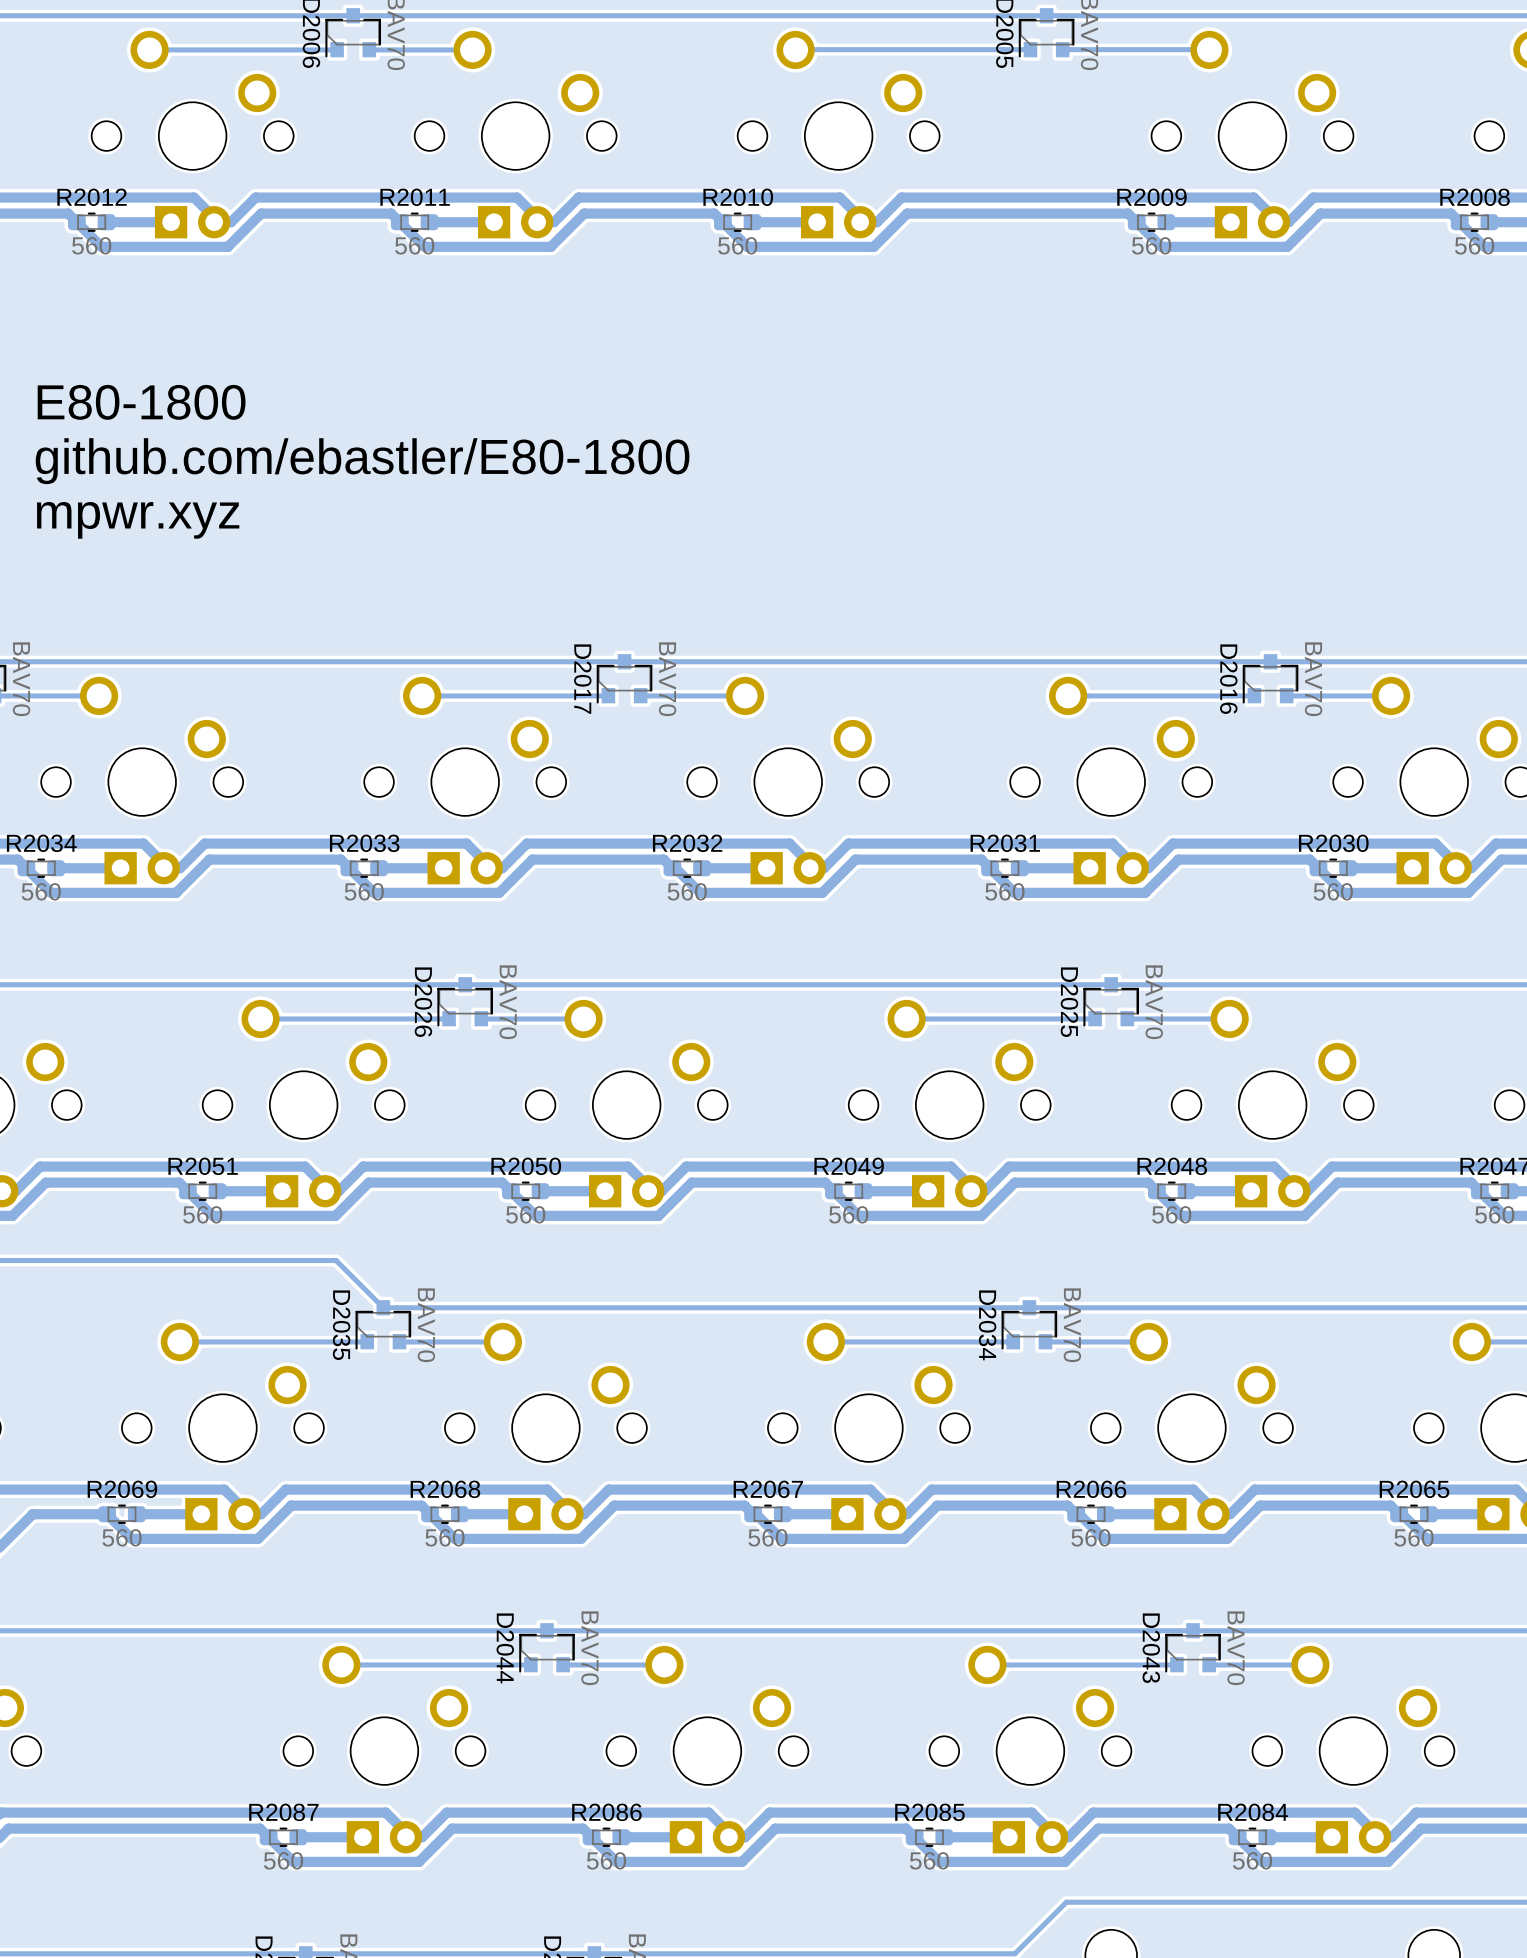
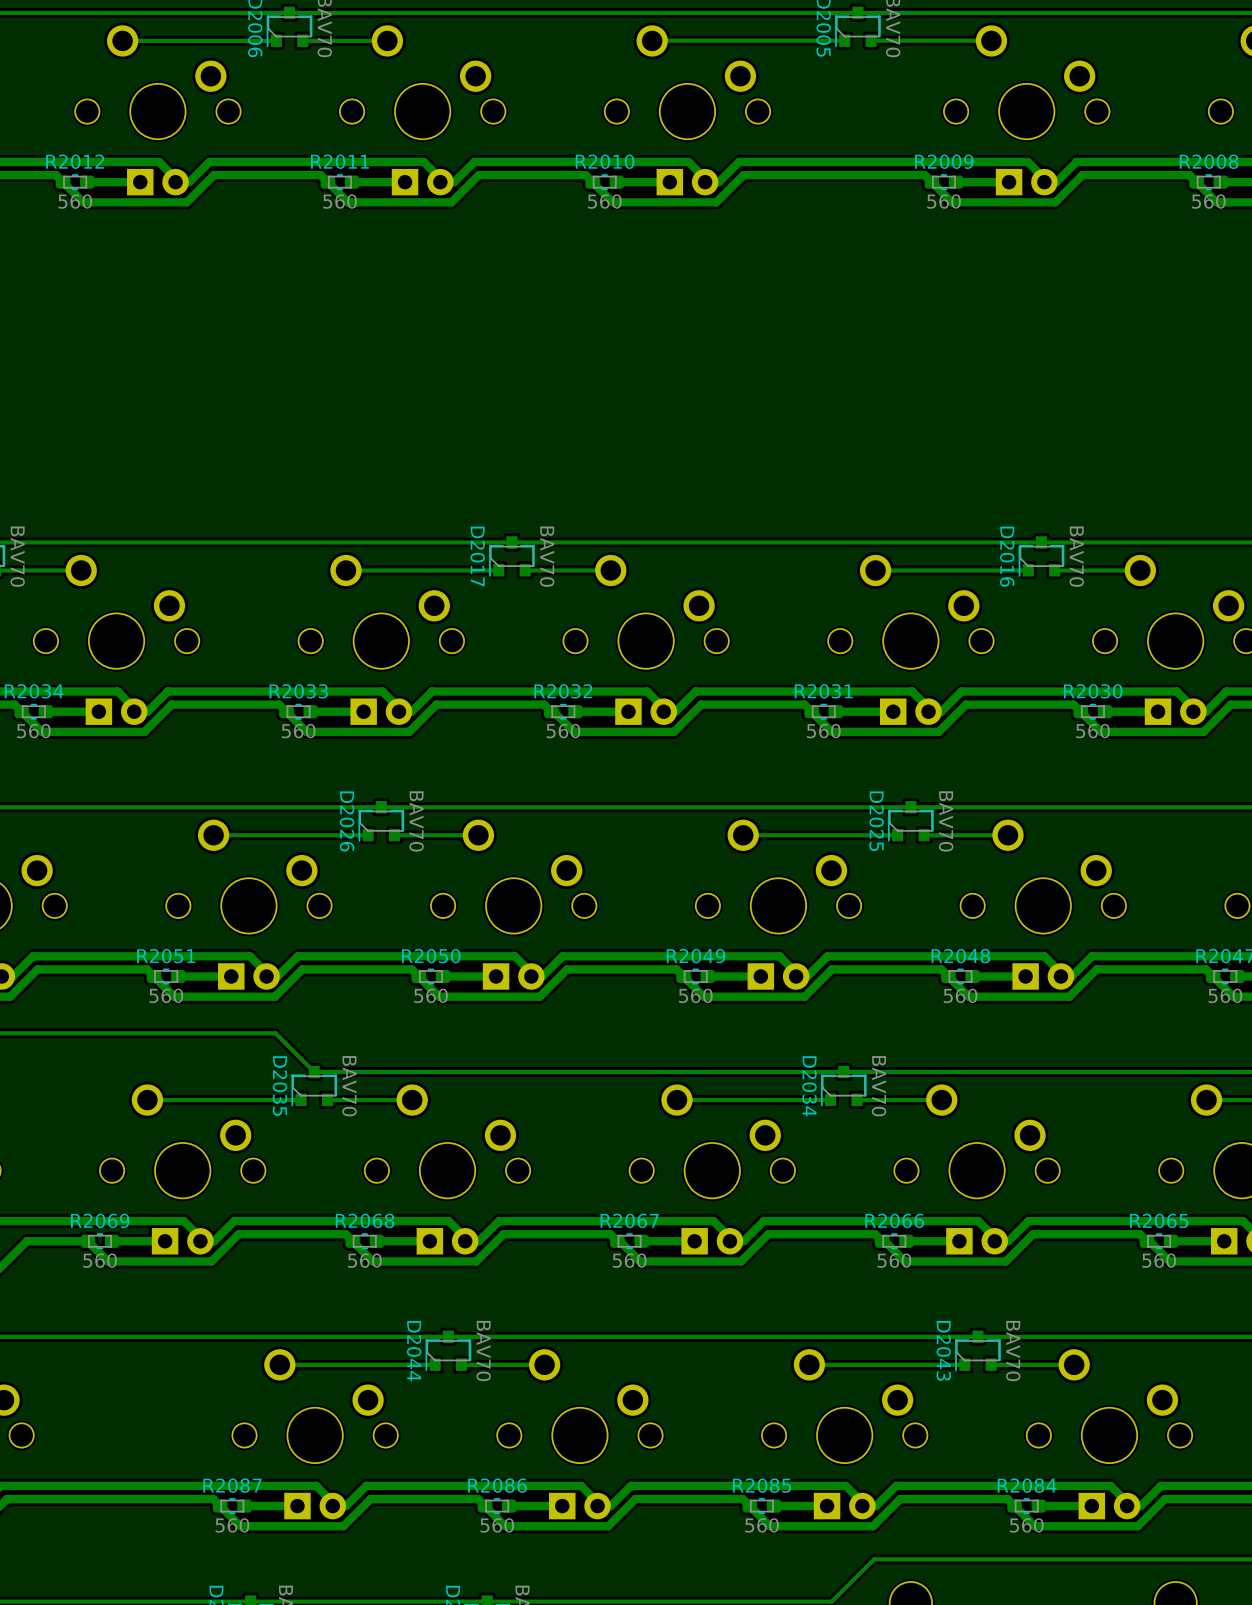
text: E80-1800 (141, 402) -> none
text: github.com/ebastler/E80-1800 (362, 461) -> none
text: mpwr.xyz (138, 520) -> none

